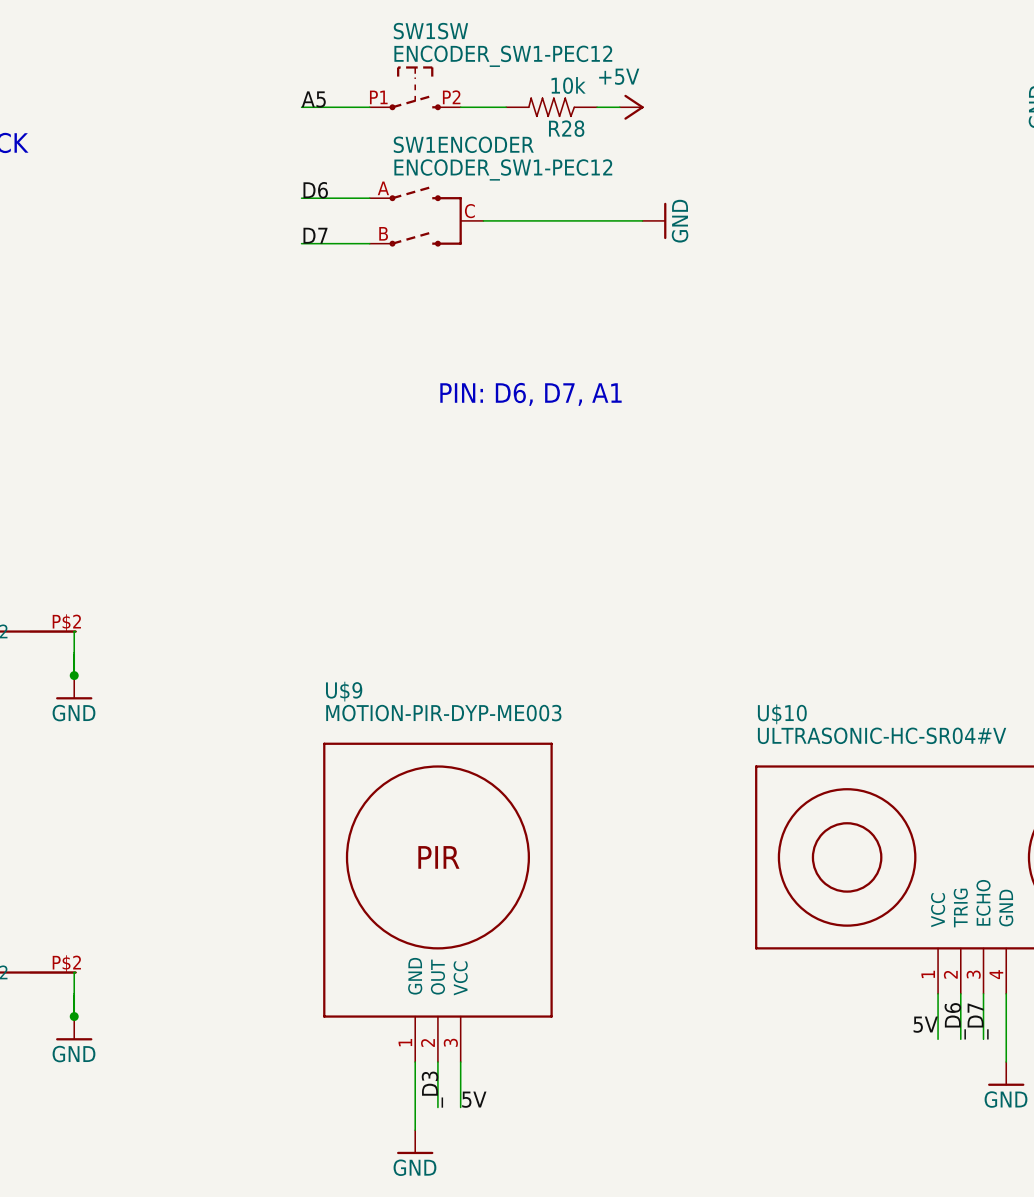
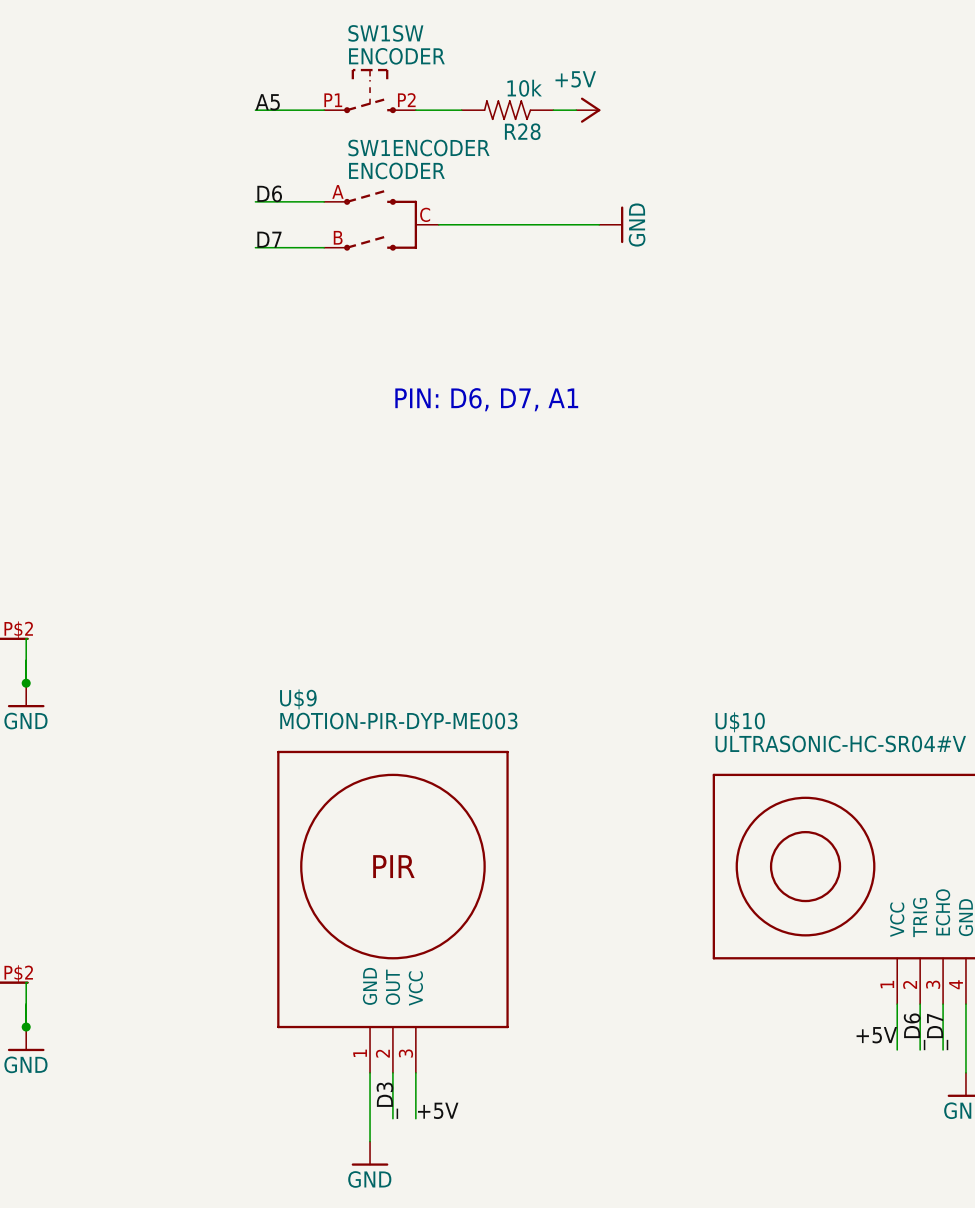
SW1SW value: ENCODER_SW1-PEC12 (503, 56) -> ENCODER (396, 56)
SW1ENCODER value: ENCODER_SW1-PEC12 (503, 169) -> ENCODER (396, 170)
label: 5V (925, 1024) -> +5V (876, 1035)
label: 5V (474, 1099) -> +5V (438, 1110)

